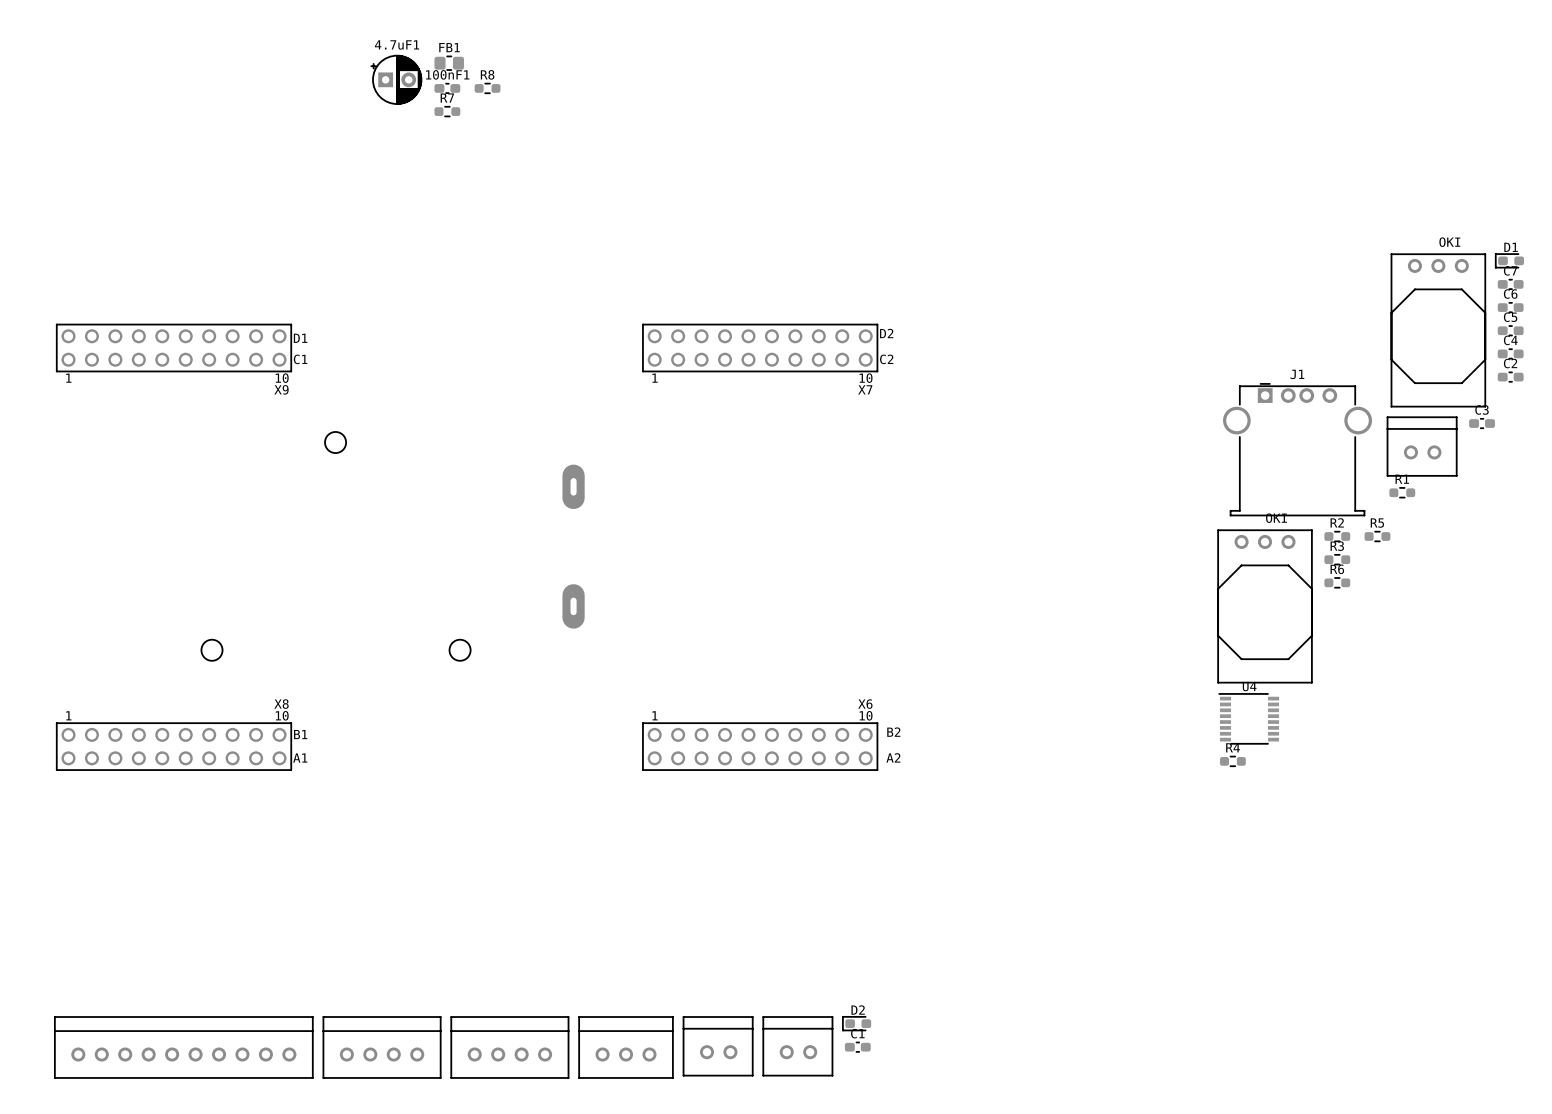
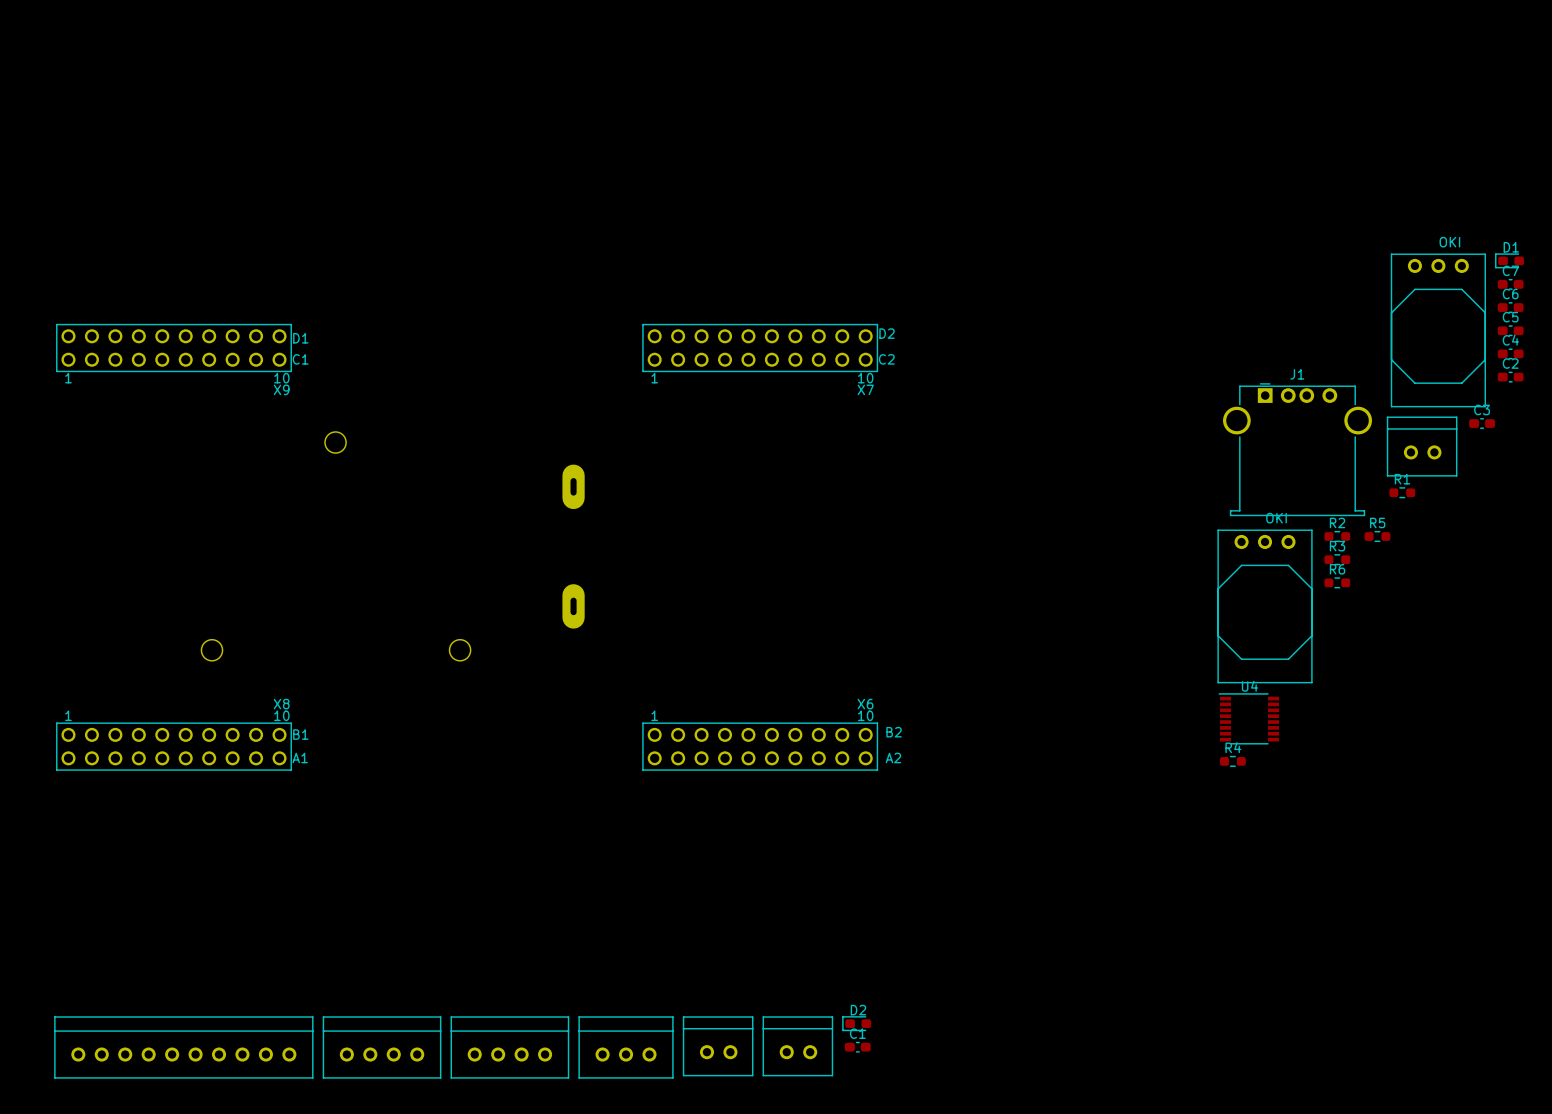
FB1: (449, 63) -> none
4.7uF1: (396, 79) -> none
100nF1: (447, 88) -> none
R8: (487, 88) -> none
R7: (447, 111) -> none

